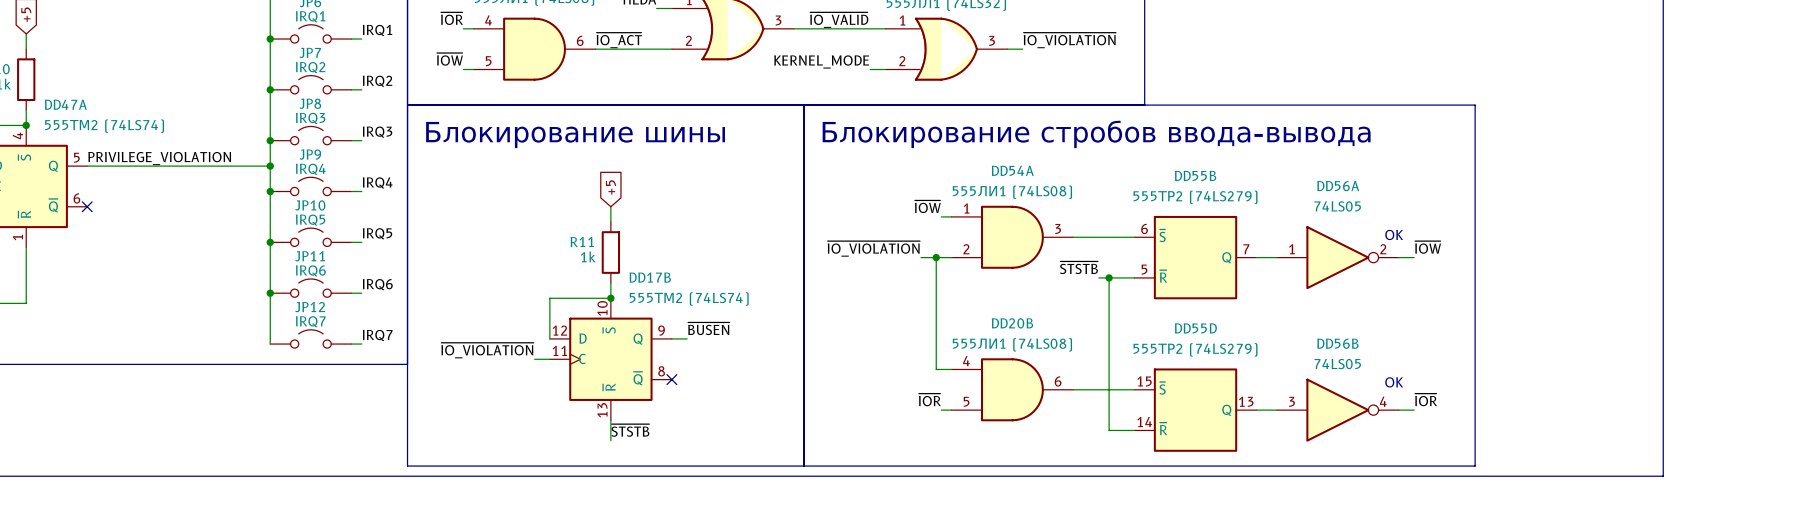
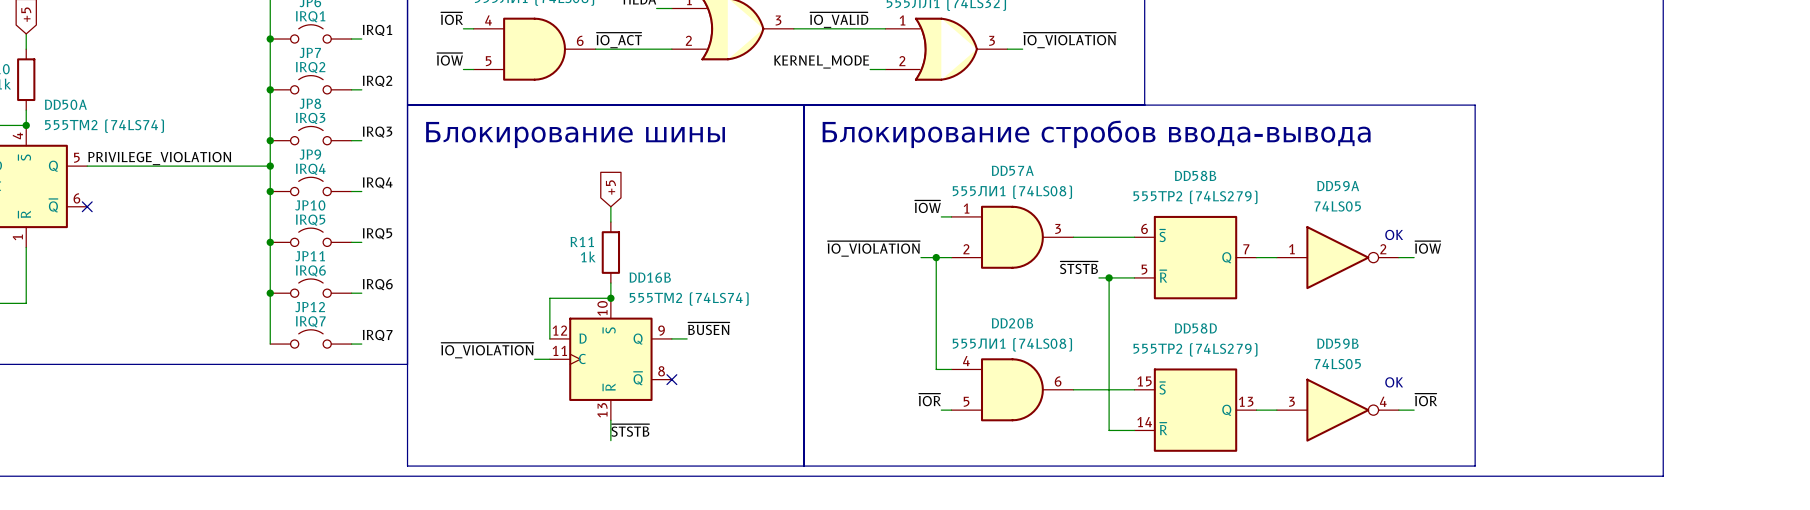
DD47A name: DD47A (65, 104) -> DD50A (65, 104)
DD54A name: DD54A (1012, 170) -> DD57A (1012, 170)
DD55B name: DD55B (1195, 175) -> DD58B (1195, 175)
DD56A name: DD56A (1338, 186) -> DD59A (1338, 186)
DD17B name: DD17B (650, 277) -> DD16B (650, 277)
DD55D name: DD55D (1195, 328) -> DD58D (1195, 328)
DD56B name: DD56B (1337, 343) -> DD59B (1337, 343)

